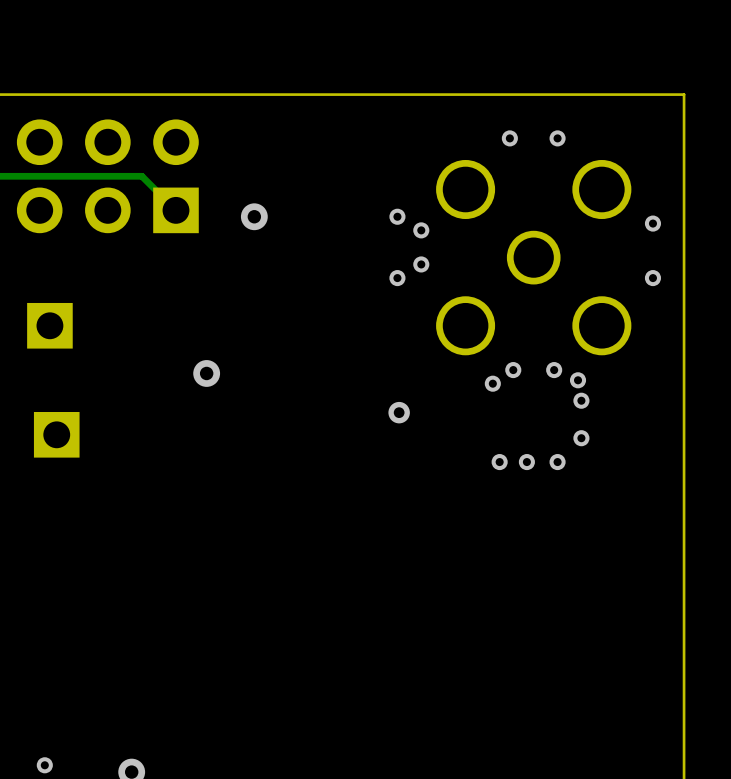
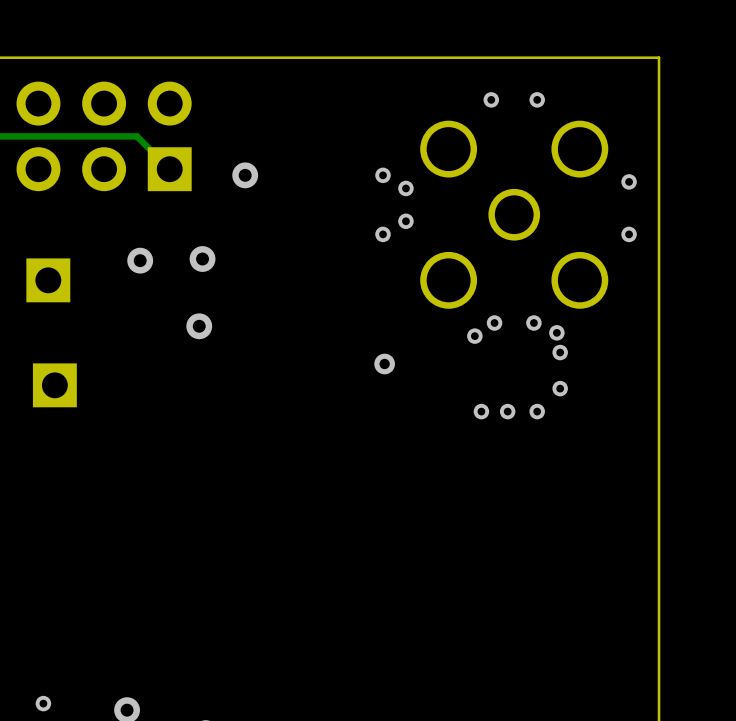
via: none -> (202, 259)
via: none -> (140, 260)

